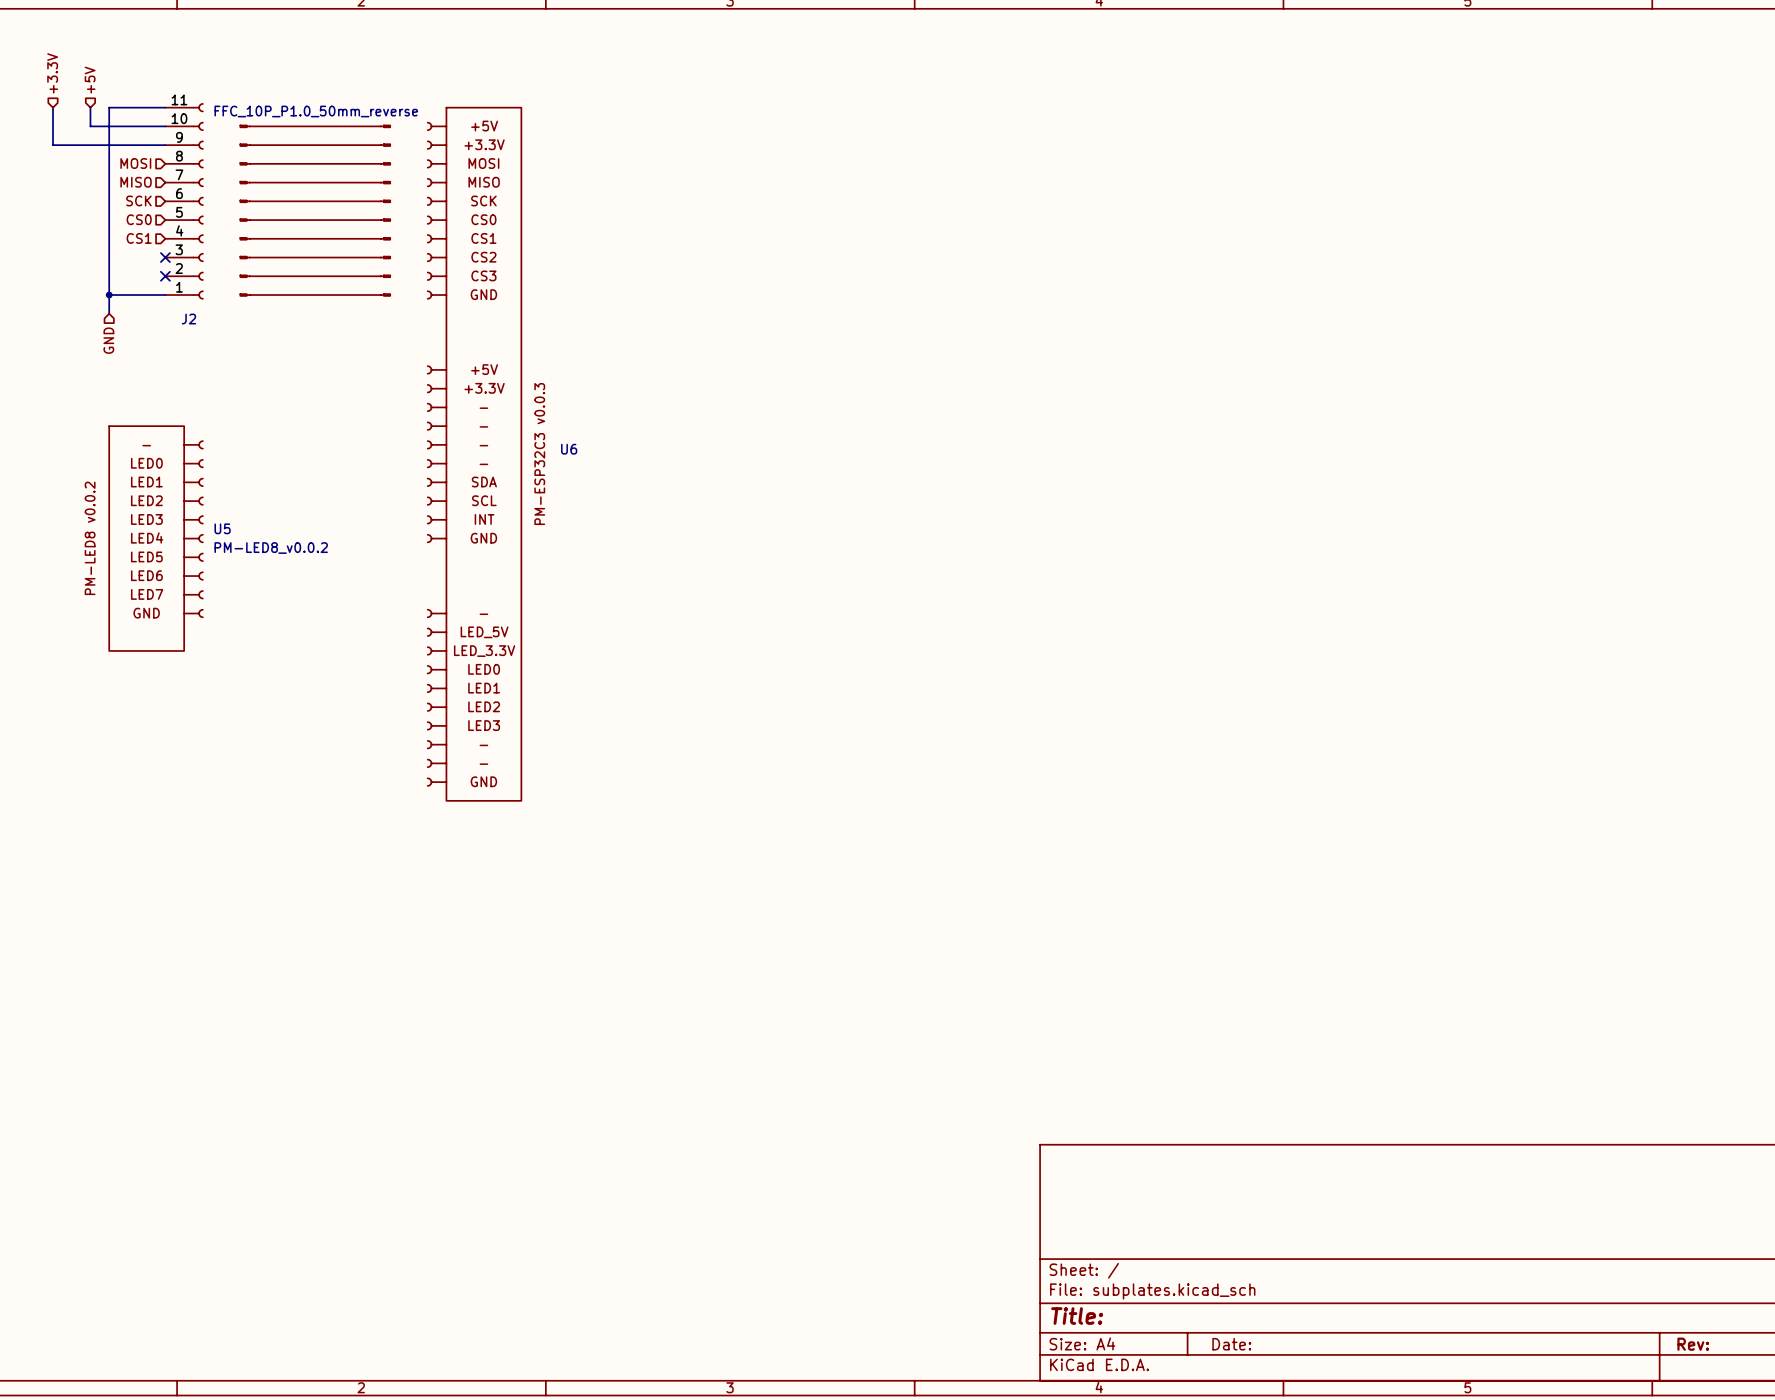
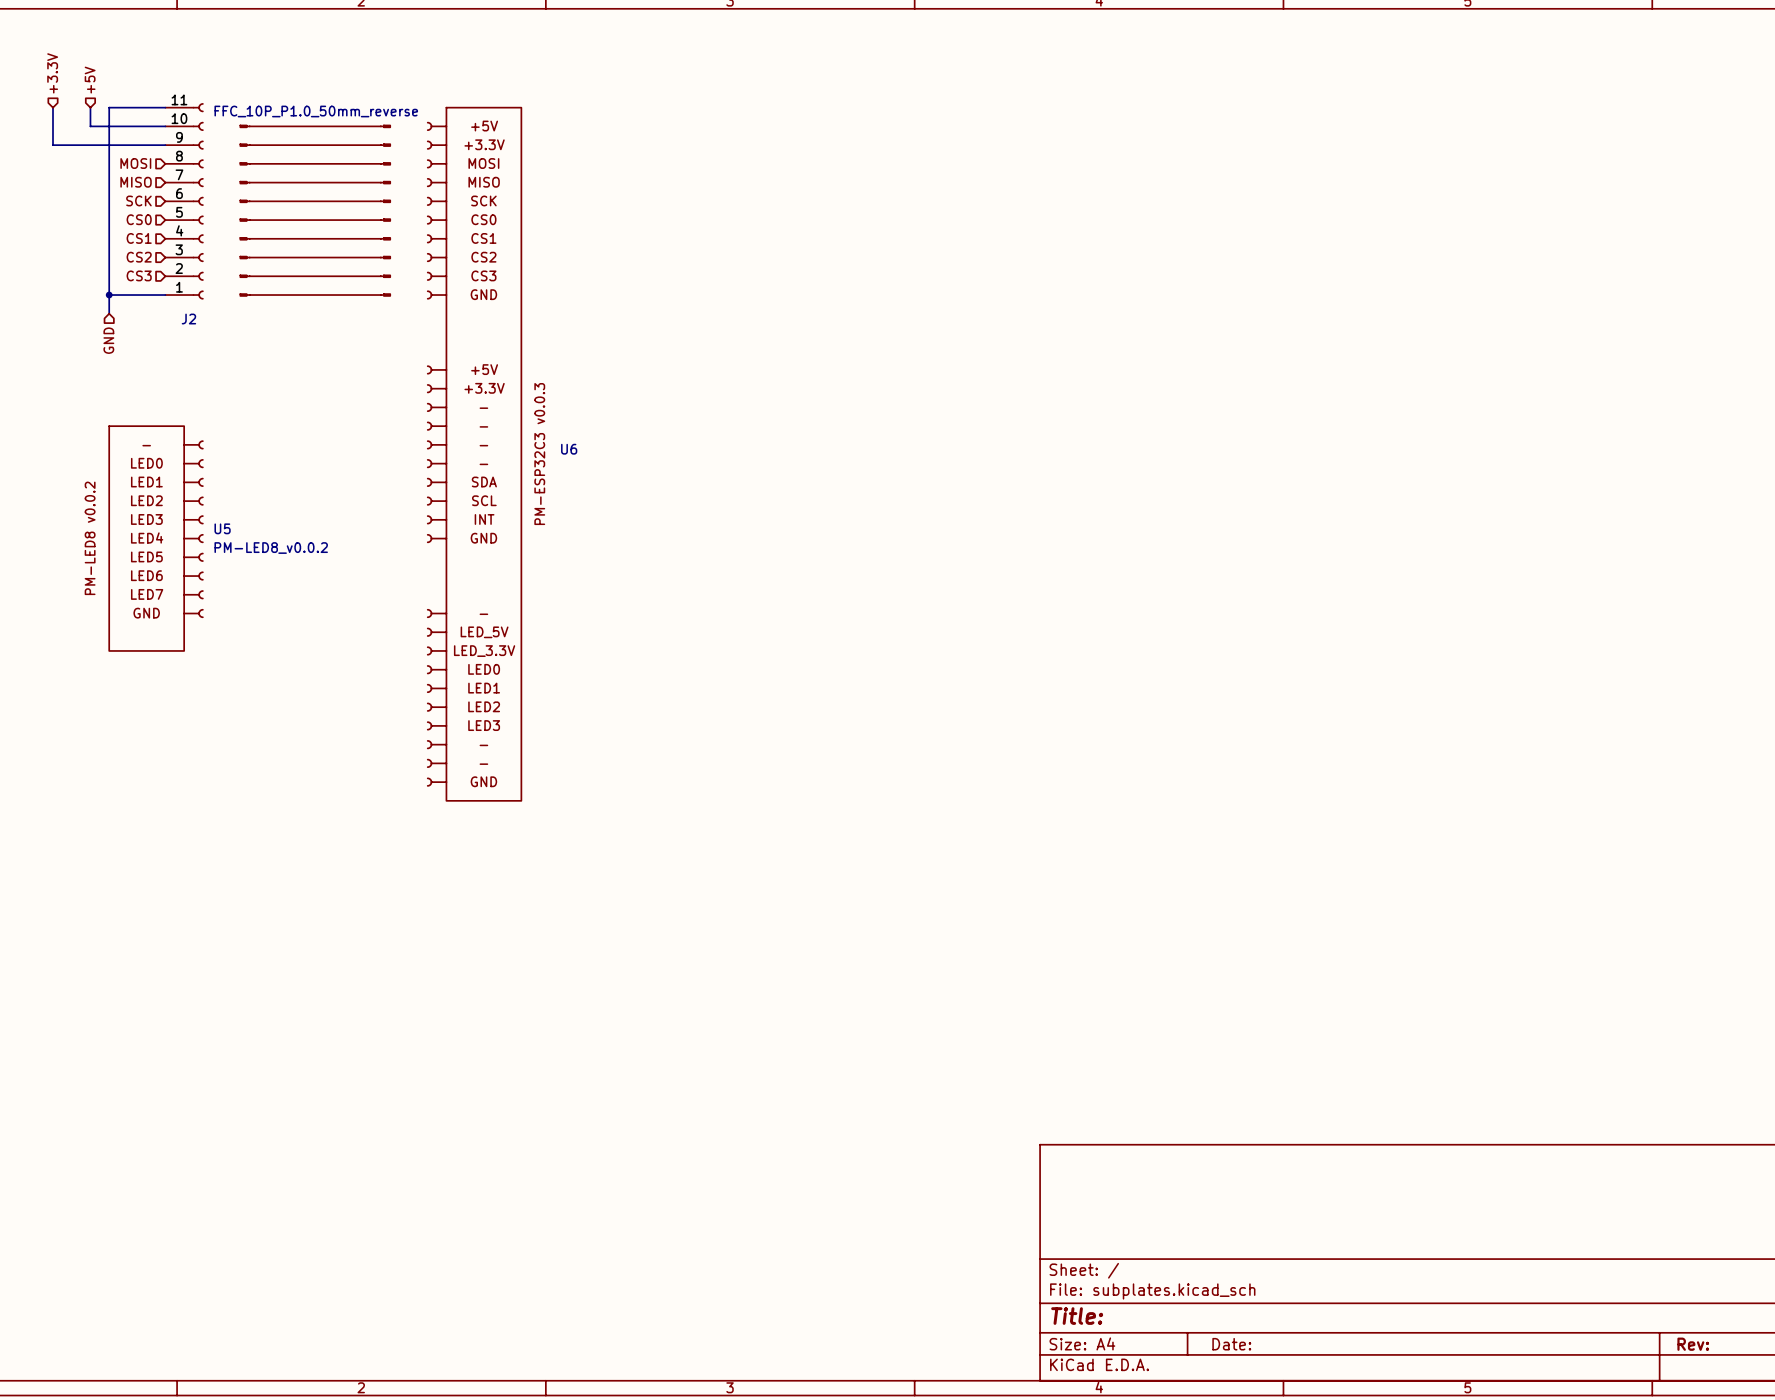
hierarchical label: none -> CS2 (139, 257)
no-connect mark: (165, 257) -> none
hierarchical label: none -> CS3 (139, 275)
no-connect mark: (165, 276) -> none

